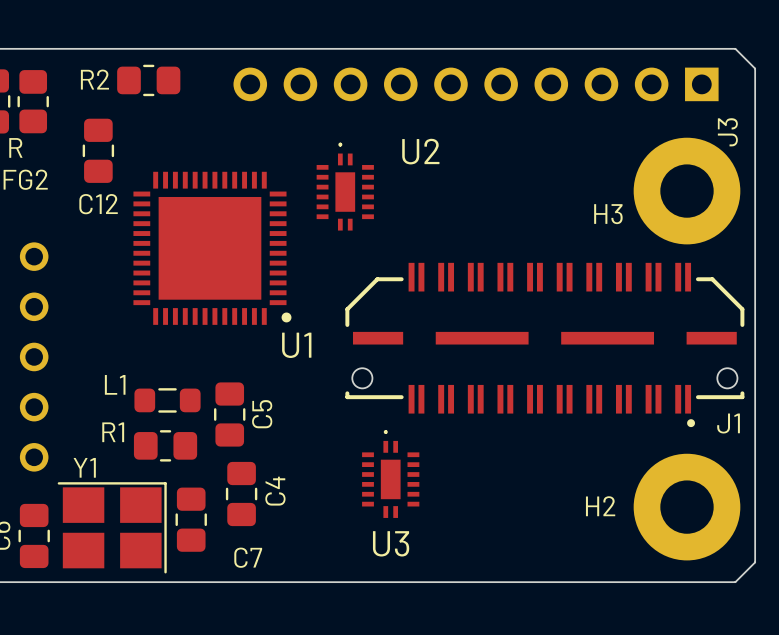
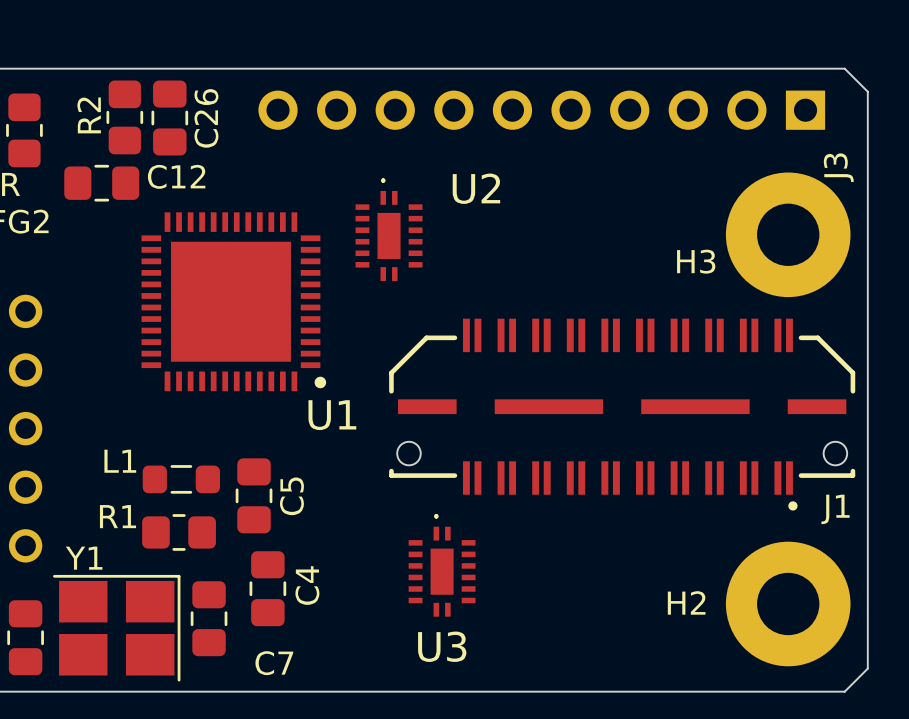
R2 rotation: 0° (148, 80) -> 90° clockwise (124, 117)
C26: none -> (169, 117)
C12 rotation: 0° (98, 150) -> 90° clockwise (101, 183)
C12 name position: C12 (98, 204) -> C12 (176, 176)

